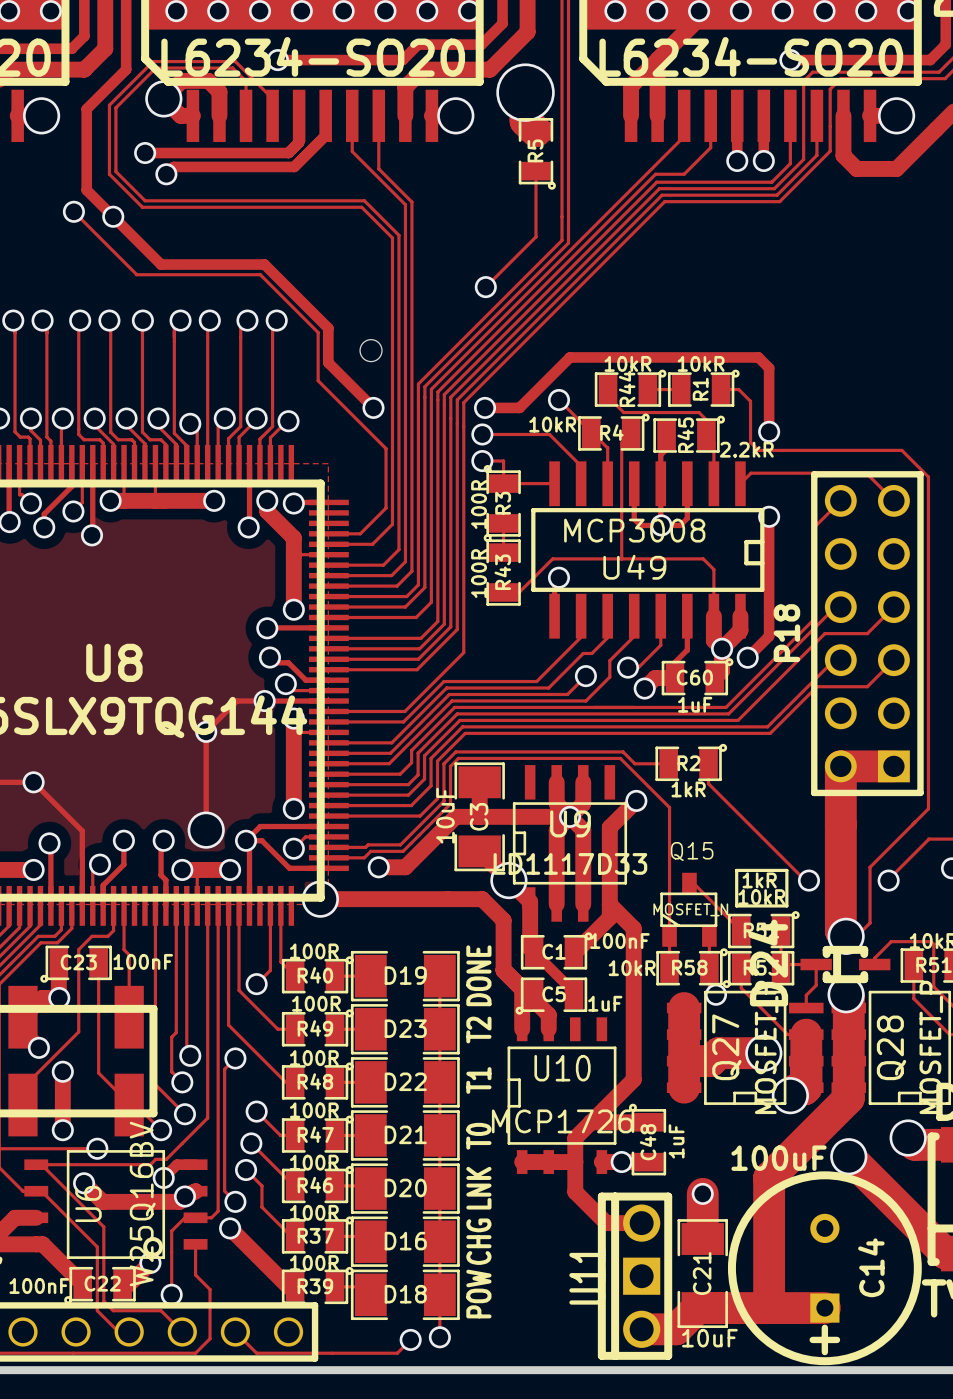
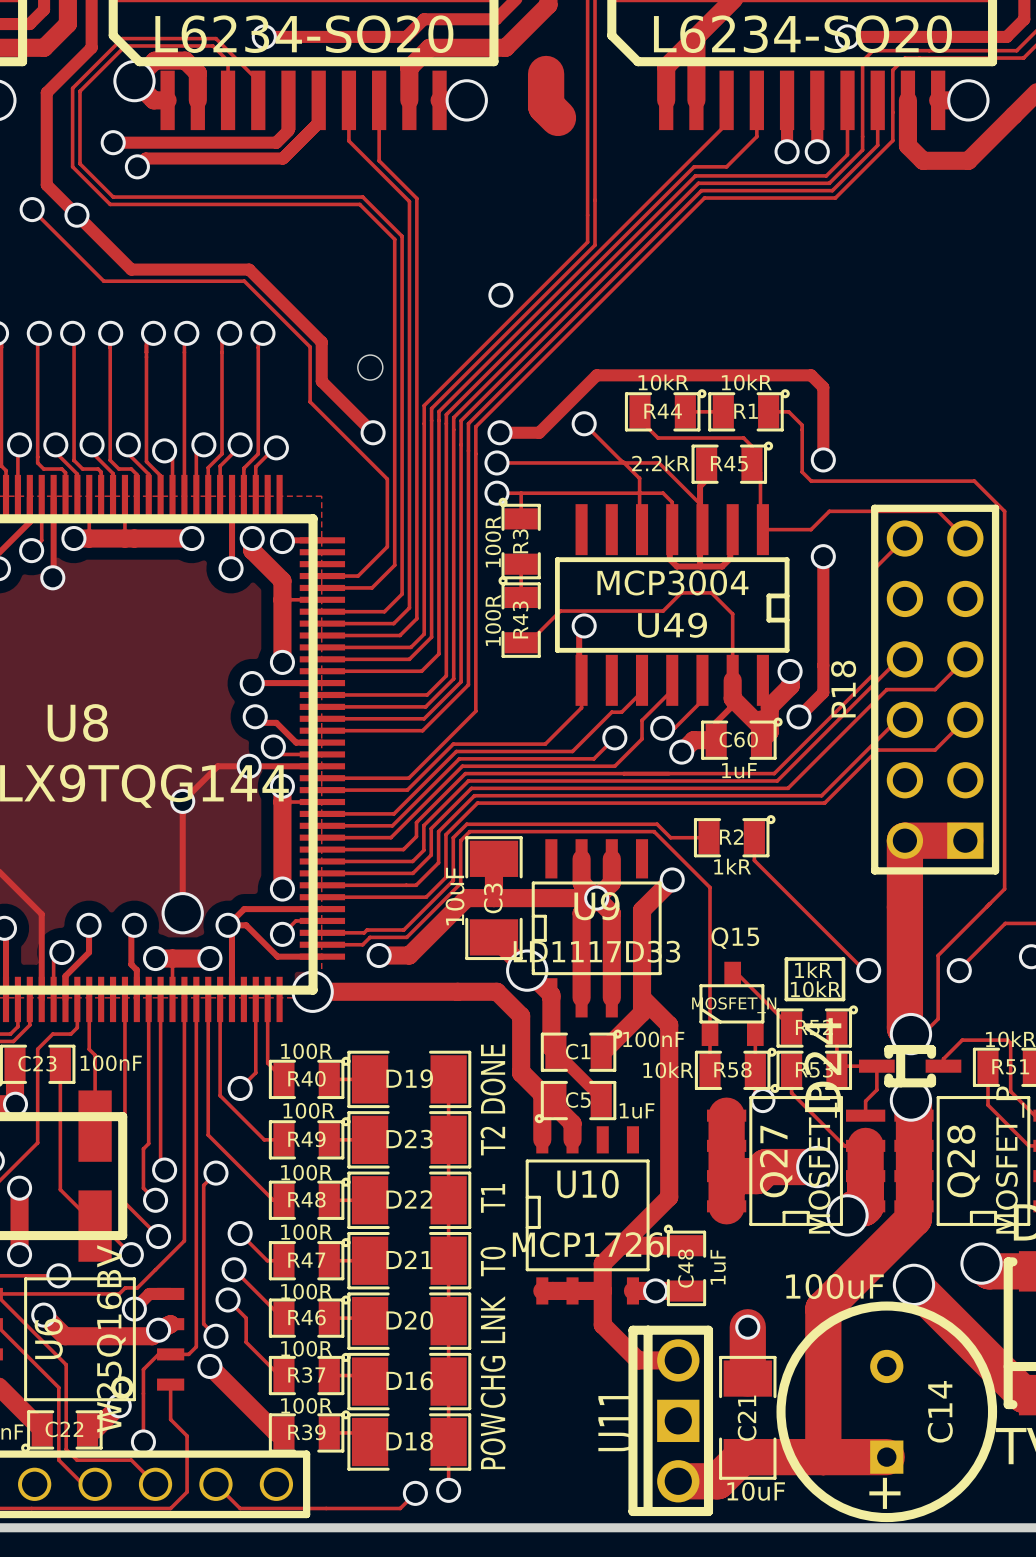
via: (525, 92) -> none
R5: (537, 153) -> none
track: (535, 171) (535, 236) (485, 287) -> none
R44 name rotation: 0° (627, 388) -> 90° clockwise (663, 411)
R1 name rotation: 0° (700, 389) -> 90° clockwise (746, 411)
R4: 10kR (613, 432) -> none
track: (631, 433) (621, 442) (621, 558) -> none
track: (549, 434) (581, 466) (581, 483) -> (573, 462) (659, 462) (702, 506) (702, 529)
R45 name rotation: 0° (685, 435) -> 90° clockwise (729, 463)
R45 value position: 2.2kR (746, 449) -> 2.2kR (660, 463)
track: none -> (521, 493) (663, 493) (672, 502) (672, 529)
U49 footprint: [531, 461, 765, 639] -> [555, 504, 790, 706]
track: (503, 483) (554, 483) -> none
track: (740, 483) (751, 473) (866, 473) (893, 500) -> (762, 529) (811, 529) (829, 511) (938, 511) (965, 538)
via: (661, 525) -> none
U49 value: MCP3008 (634, 530) -> MCP3004 (672, 582)
track: (510, 592) (519, 592) (552, 558) (703, 558) (713, 569) (713, 640) (722, 648) -> (528, 642) (560, 611) (663, 611) (681, 592) (711, 592) (732, 614) (732, 698) (762, 728)
track: (581, 616) (581, 637) (536, 681) (524, 681) -> (581, 680) (581, 707) (545, 744)
via position: (722, 648) -> (790, 671)

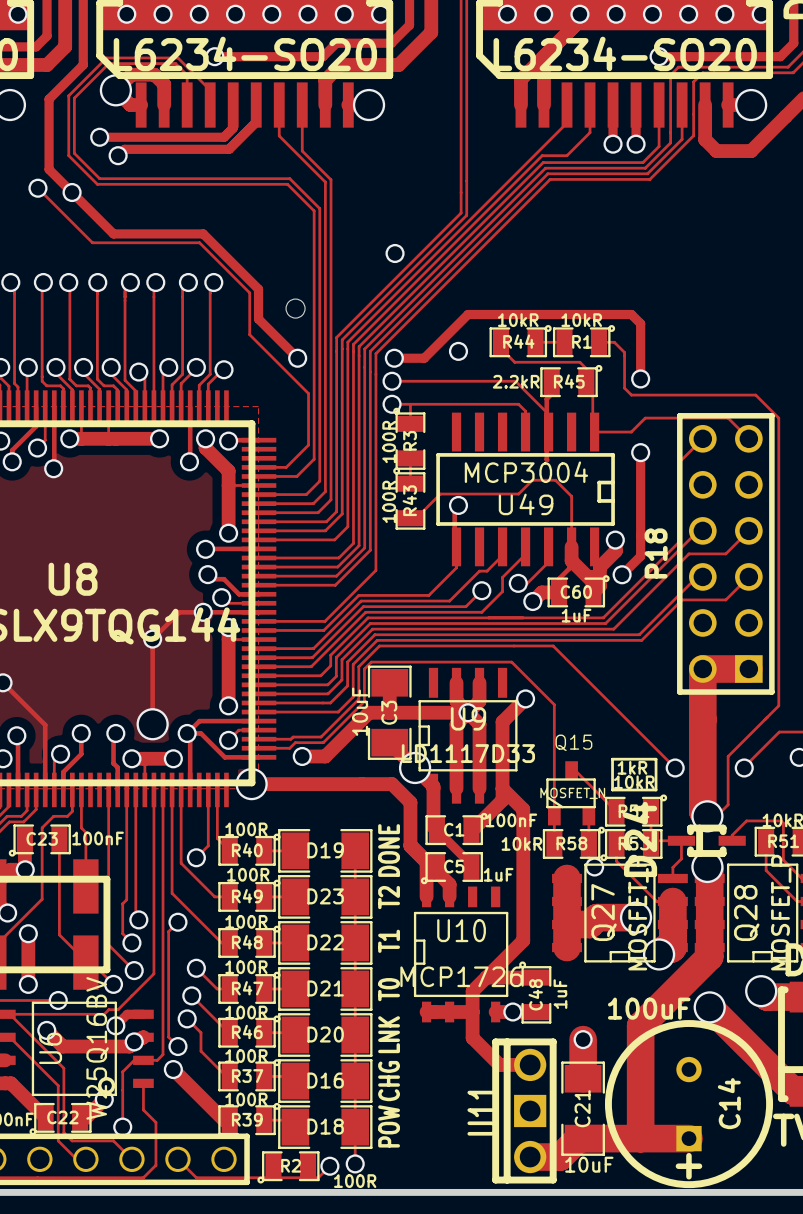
track: (546, 73) (546, 106) (558, 117) -> none
track: (584, 423) (639, 478) -> none
track: (639, 478) (639, 519) -> none
track: (669, 519) (669, 559) (676, 566) (722, 566) (730, 558) (730, 519) -> none
track: (466, 824) (657, 824) (670, 837) (709, 837) -> (369, 656) (379, 645) (553, 645) (675, 767)
R2 rotation: 0° (734, 836) -> 180° (288, 1167)
R2 position: (734, 836) -> (288, 1167)
track: (754, 837) (754, 860) (864, 970) (868, 970) -> none
R2 value: 1kR (732, 866) -> 100R (355, 1181)

